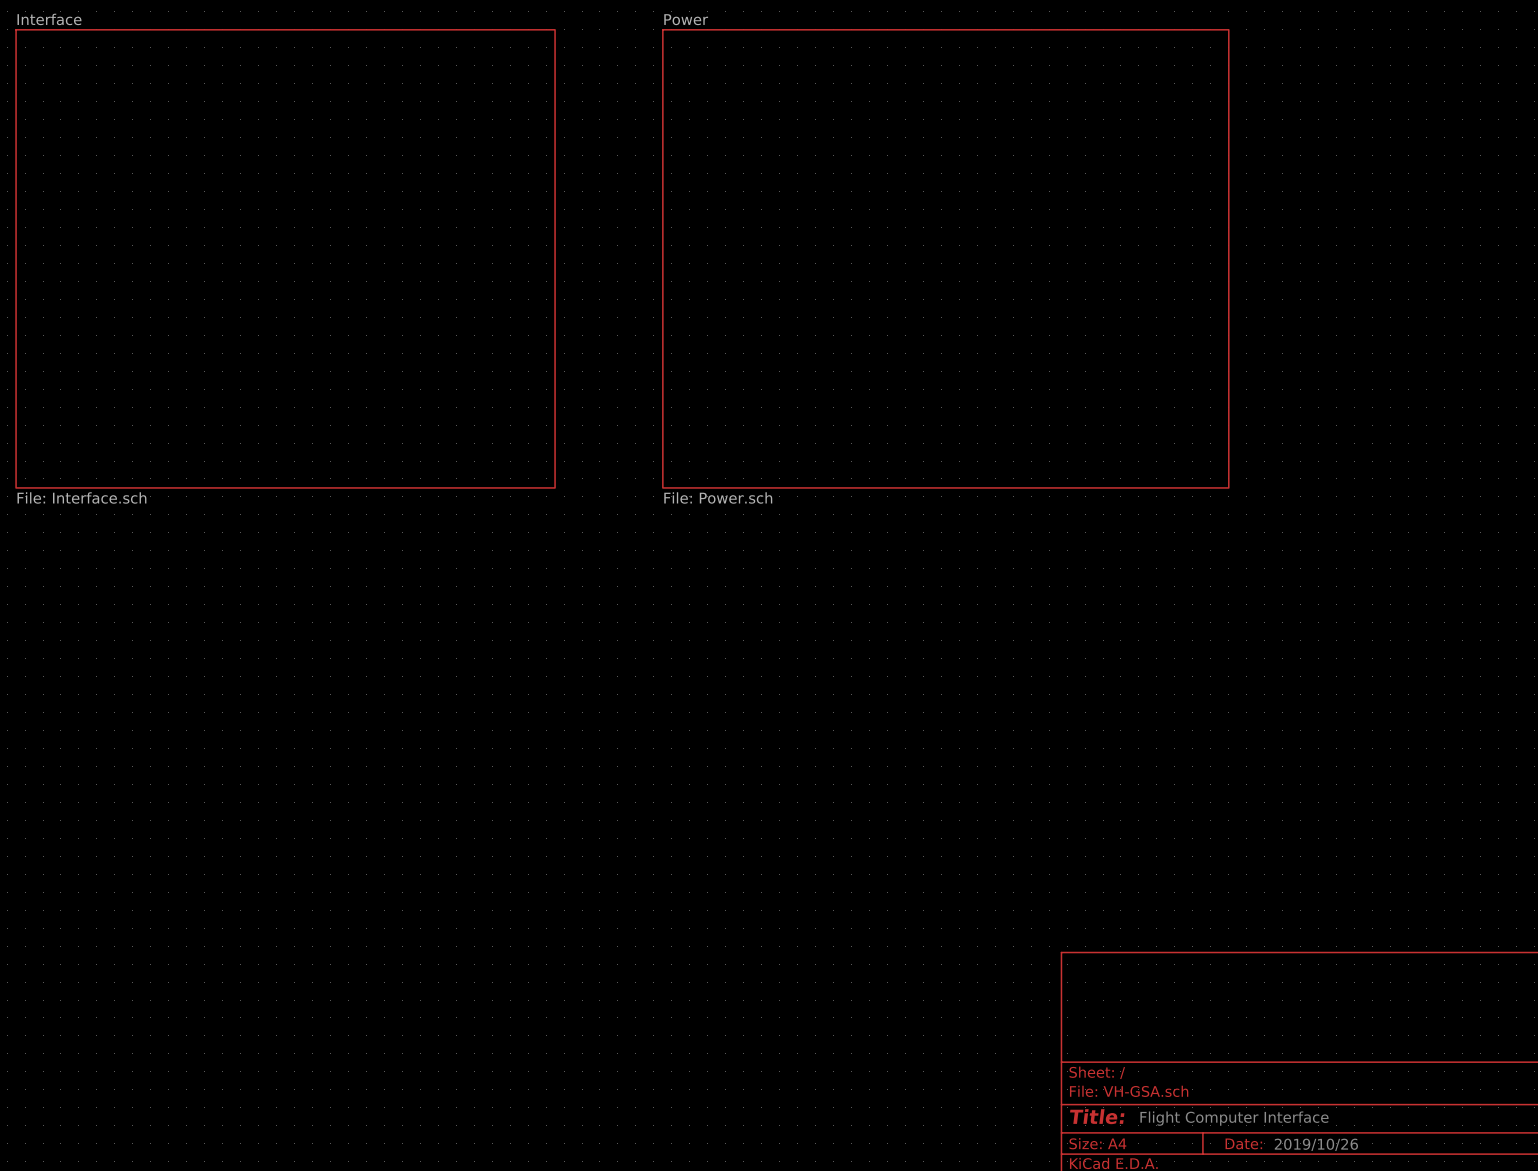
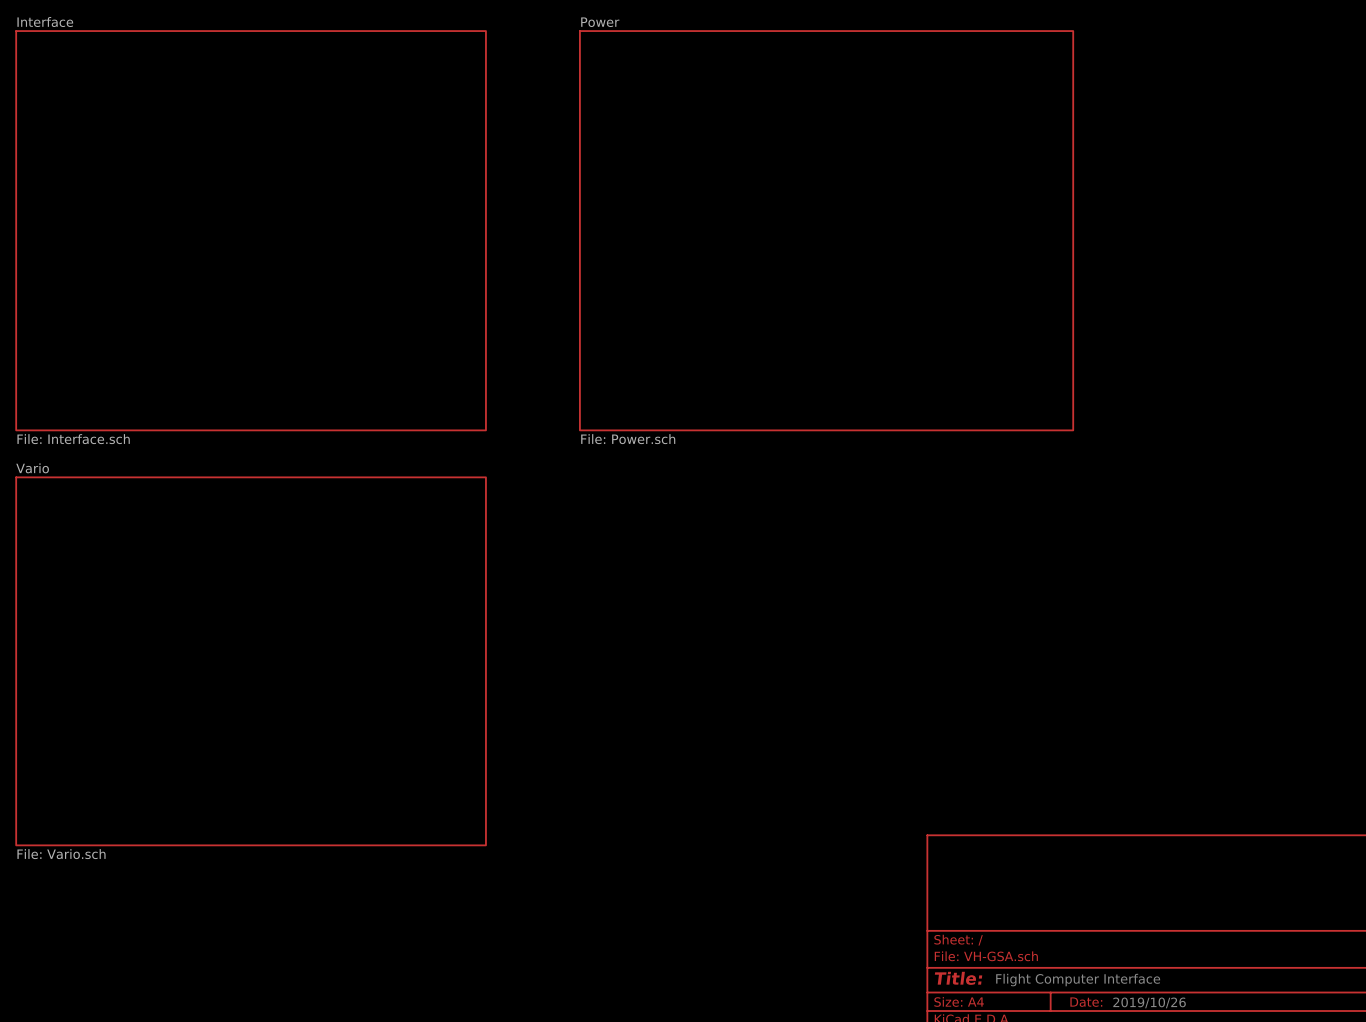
sheet Vario: none -> File: Vario.sch (251, 661)

